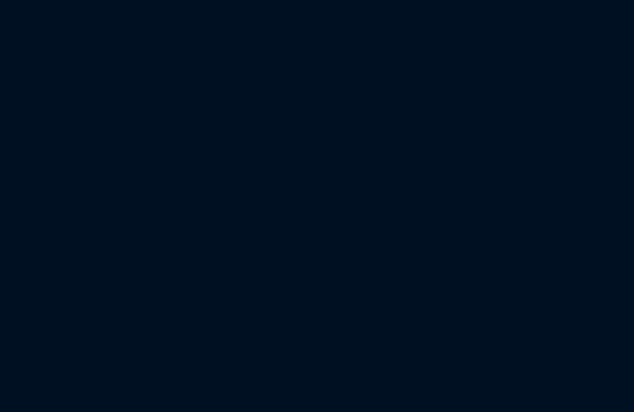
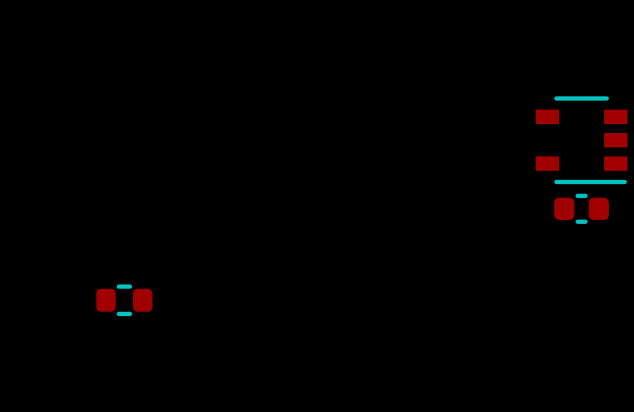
part: none -> (581, 140)
part: none -> (581, 208)
part: none -> (124, 300)

